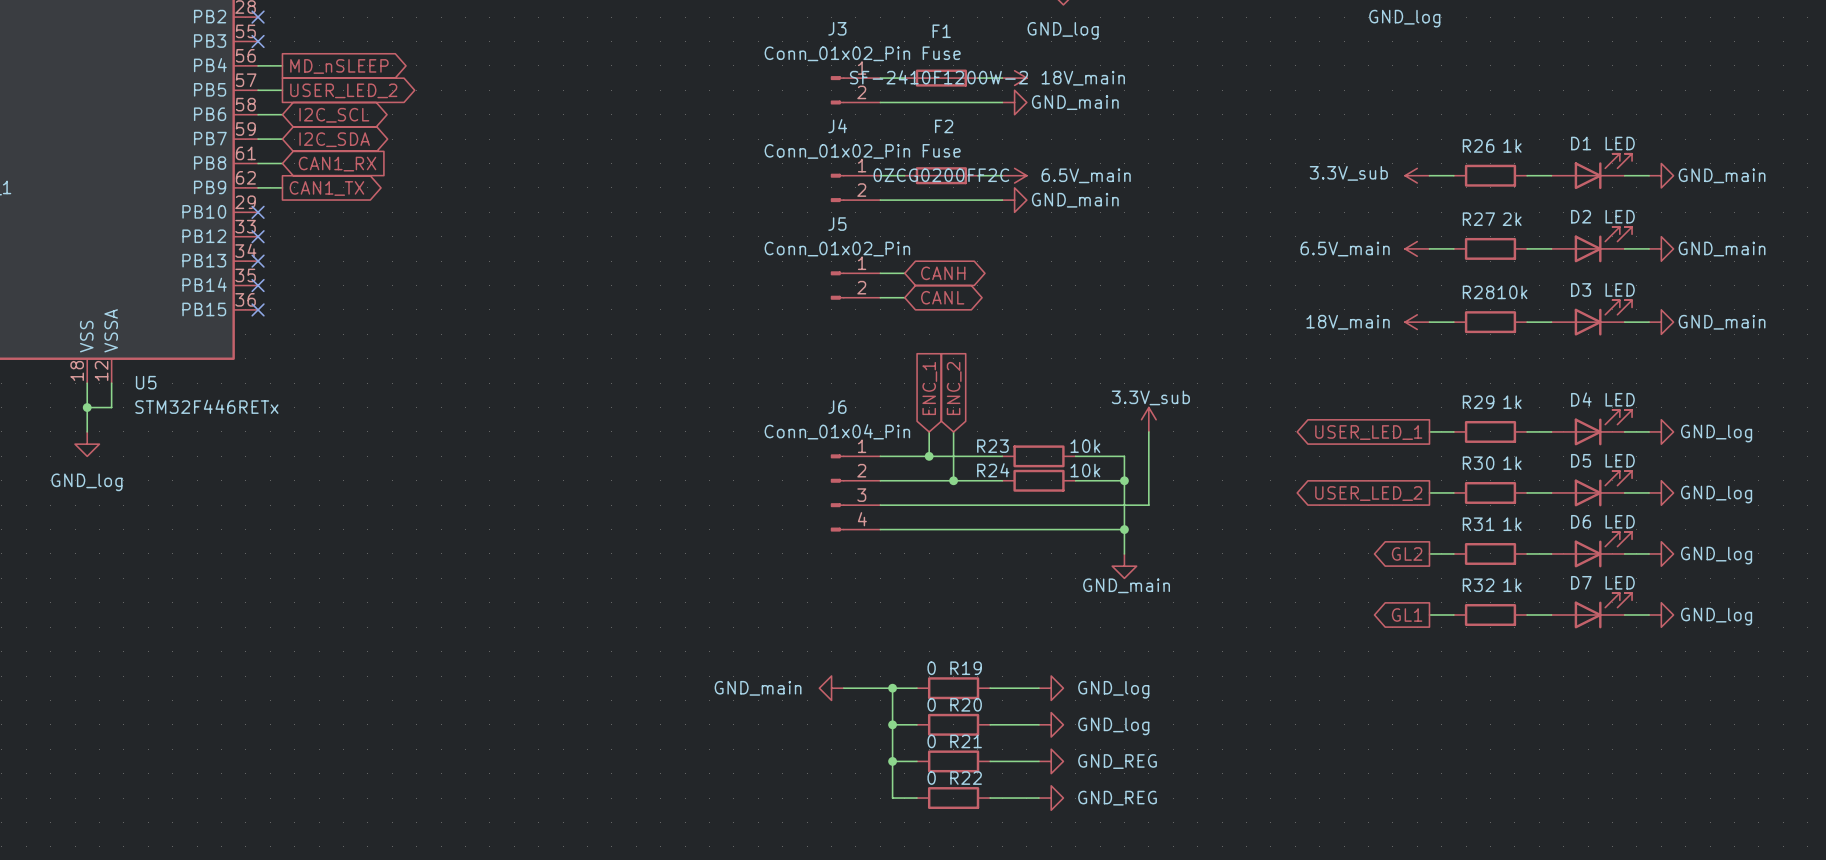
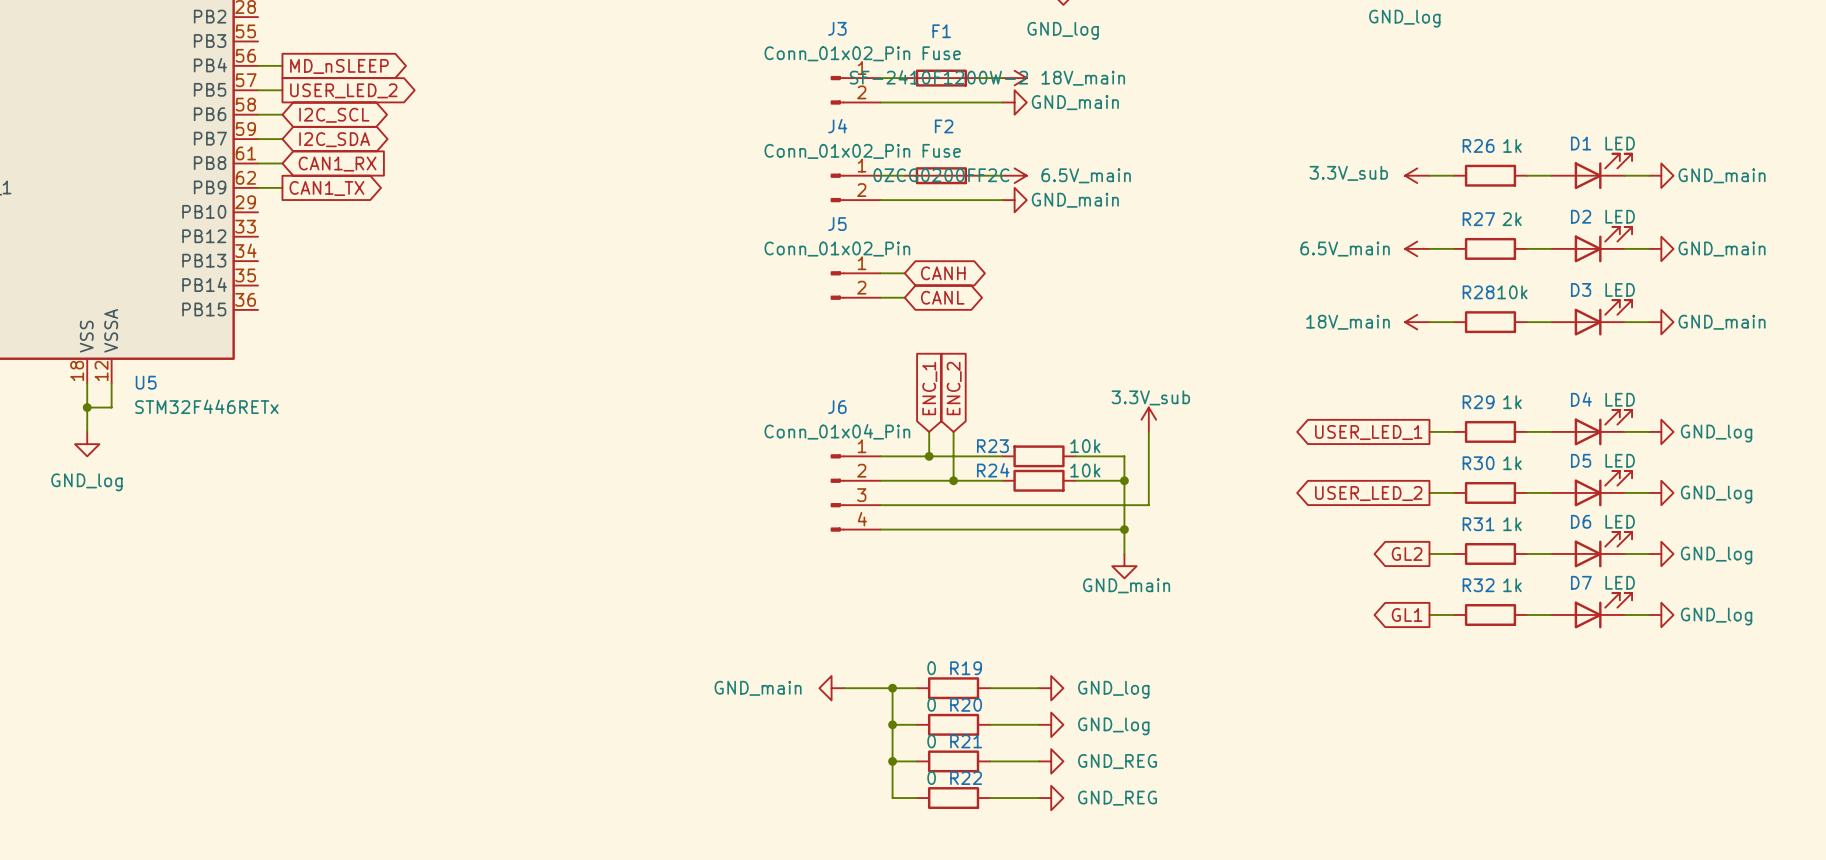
no-connect mark: (258, 17) -> none
no-connect mark: (258, 41) -> none
no-connect mark: (258, 212) -> none
no-connect mark: (258, 236) -> none
no-connect mark: (258, 261) -> none
no-connect mark: (258, 285) -> none
no-connect mark: (258, 309) -> none

